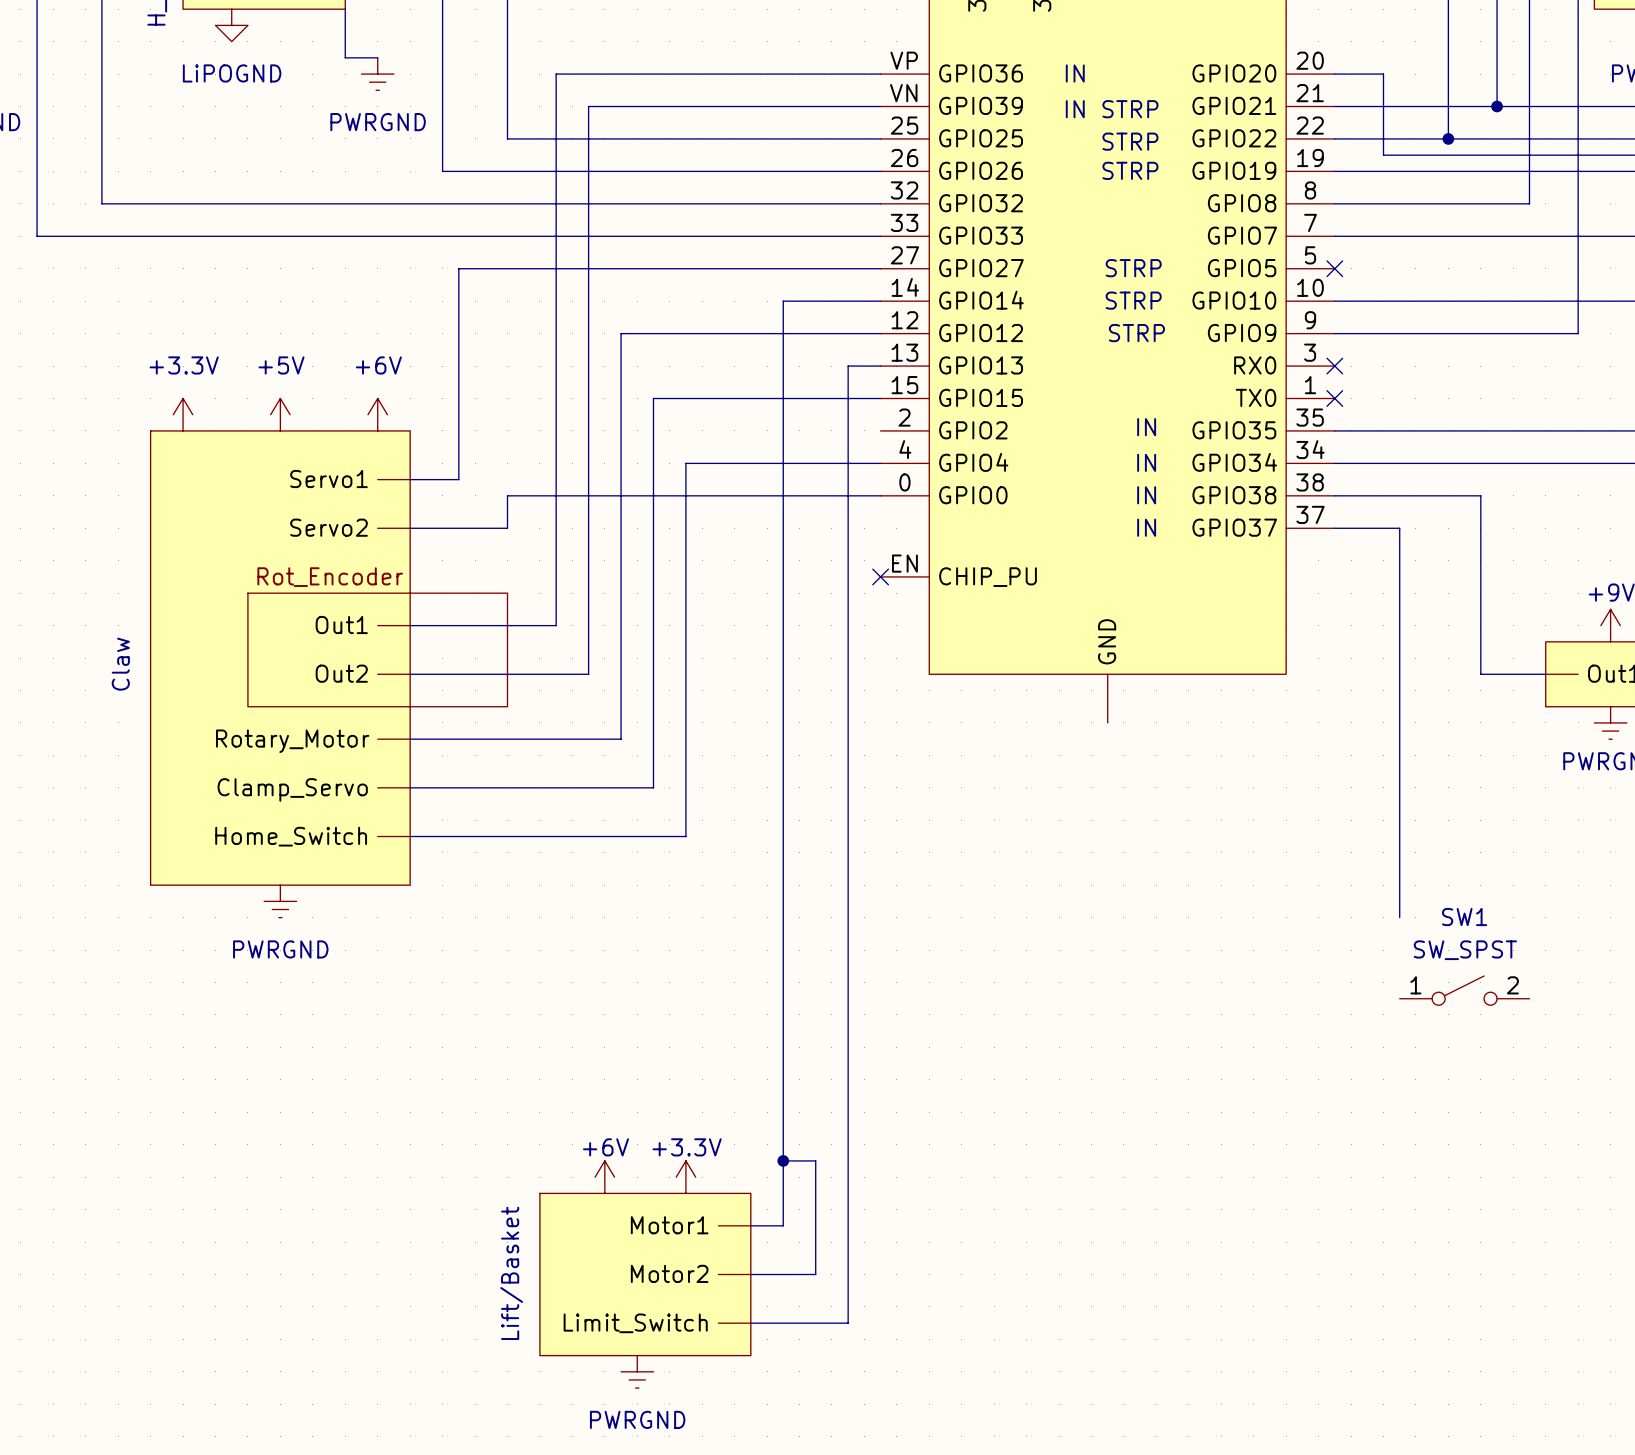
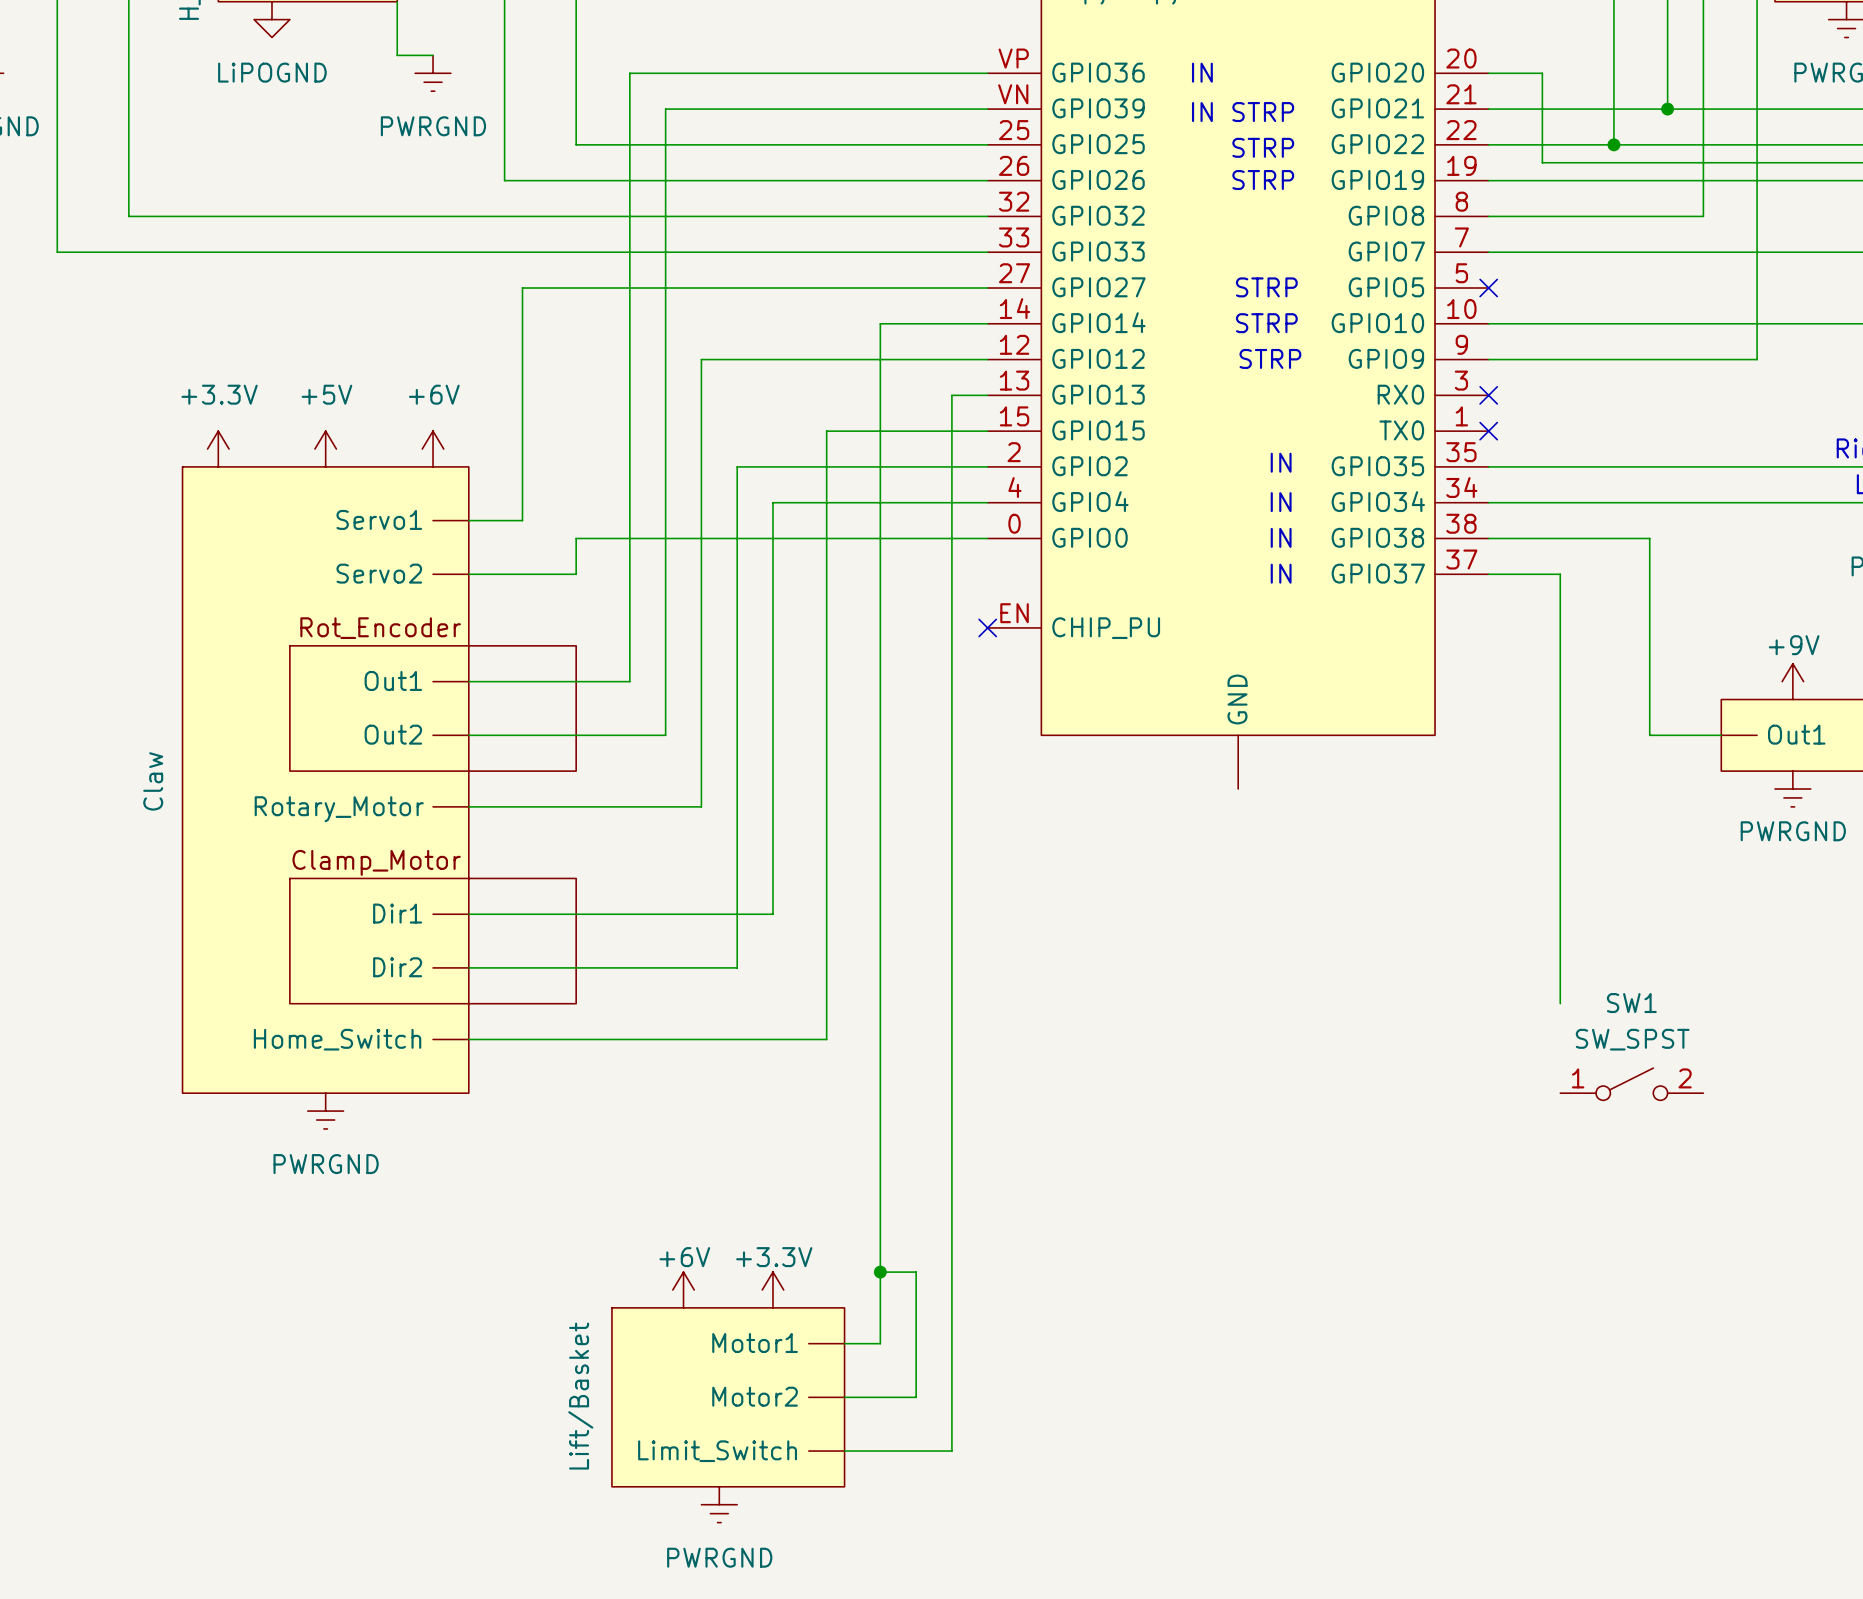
wire: (734, 398) (653, 398) (653, 430) -> (987, 466) (737, 466)
wire: none -> (826, 431) (826, 1039) (468, 1039)
Claw: (329, 658) -> none
Claw: none -> (379, 780)
wire: (410, 787) (653, 787) -> (468, 967) (737, 967) (737, 860)
power symbol position: PWRGND (280, 901) -> PWRGND (325, 1111)

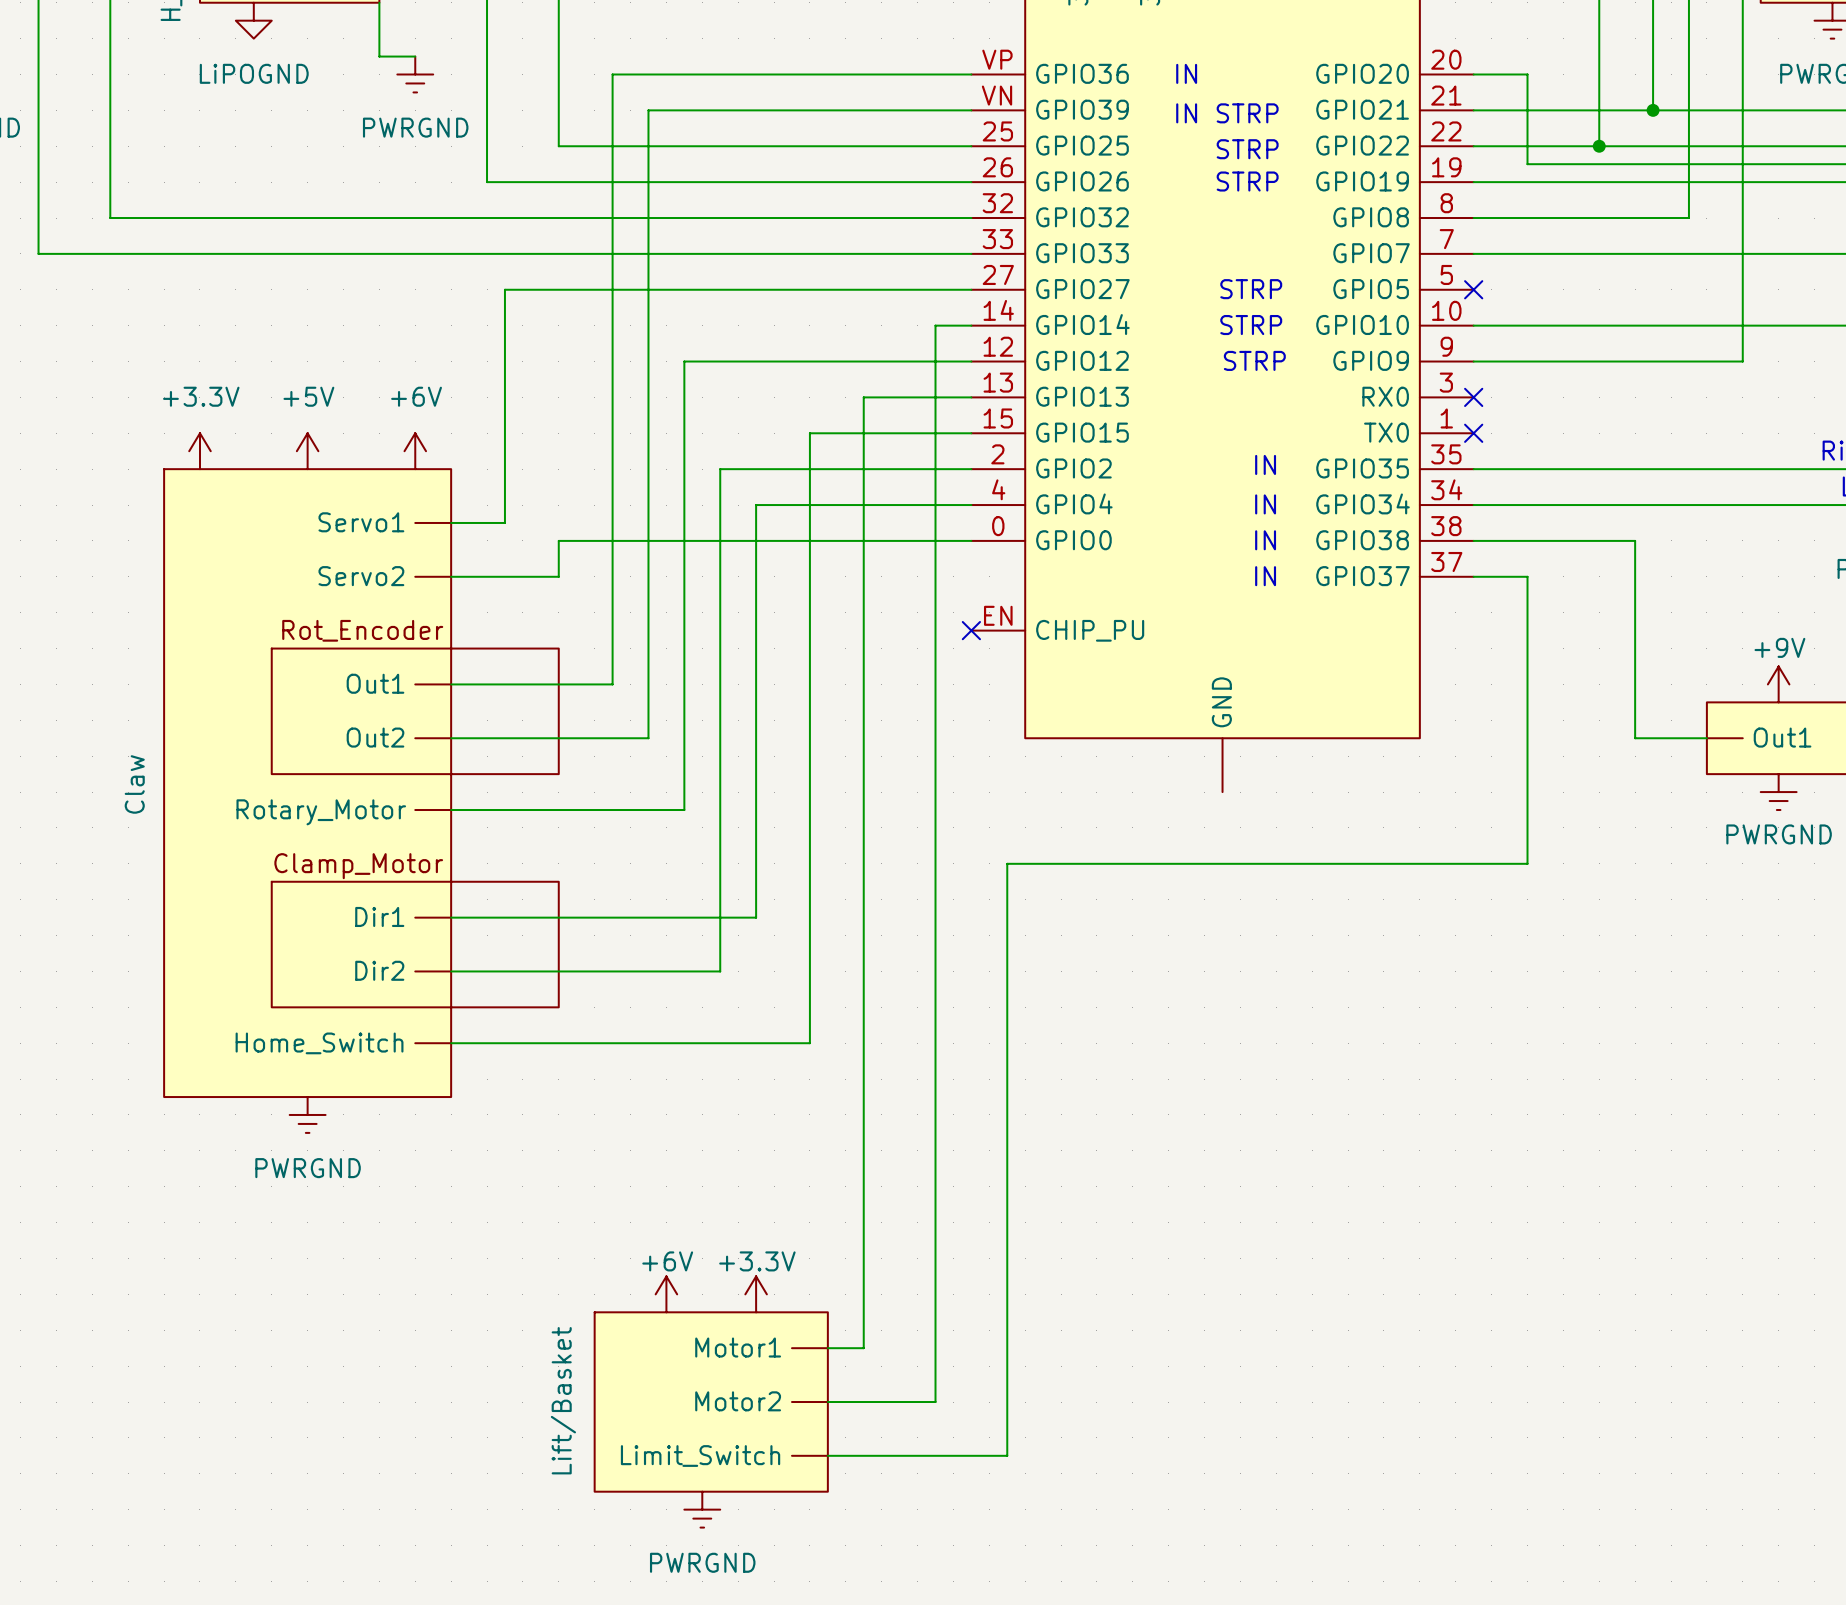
wire: (951, 323) (880, 323) (880, 395) -> (935, 325) (935, 397) (863, 397)
wire: (1542, 574) (1560, 574) (1560, 1003) -> (1527, 576) (1527, 863) (1007, 863) (1007, 1455) (935, 1455)
SW1: SW_SPST (1631, 1084) -> none
wire: (880, 1272) (916, 1272) (916, 1397) -> none
junction: (880, 1272) -> none
wire: (951, 1397) (951, 1451) -> (935, 1402) (899, 1402)

